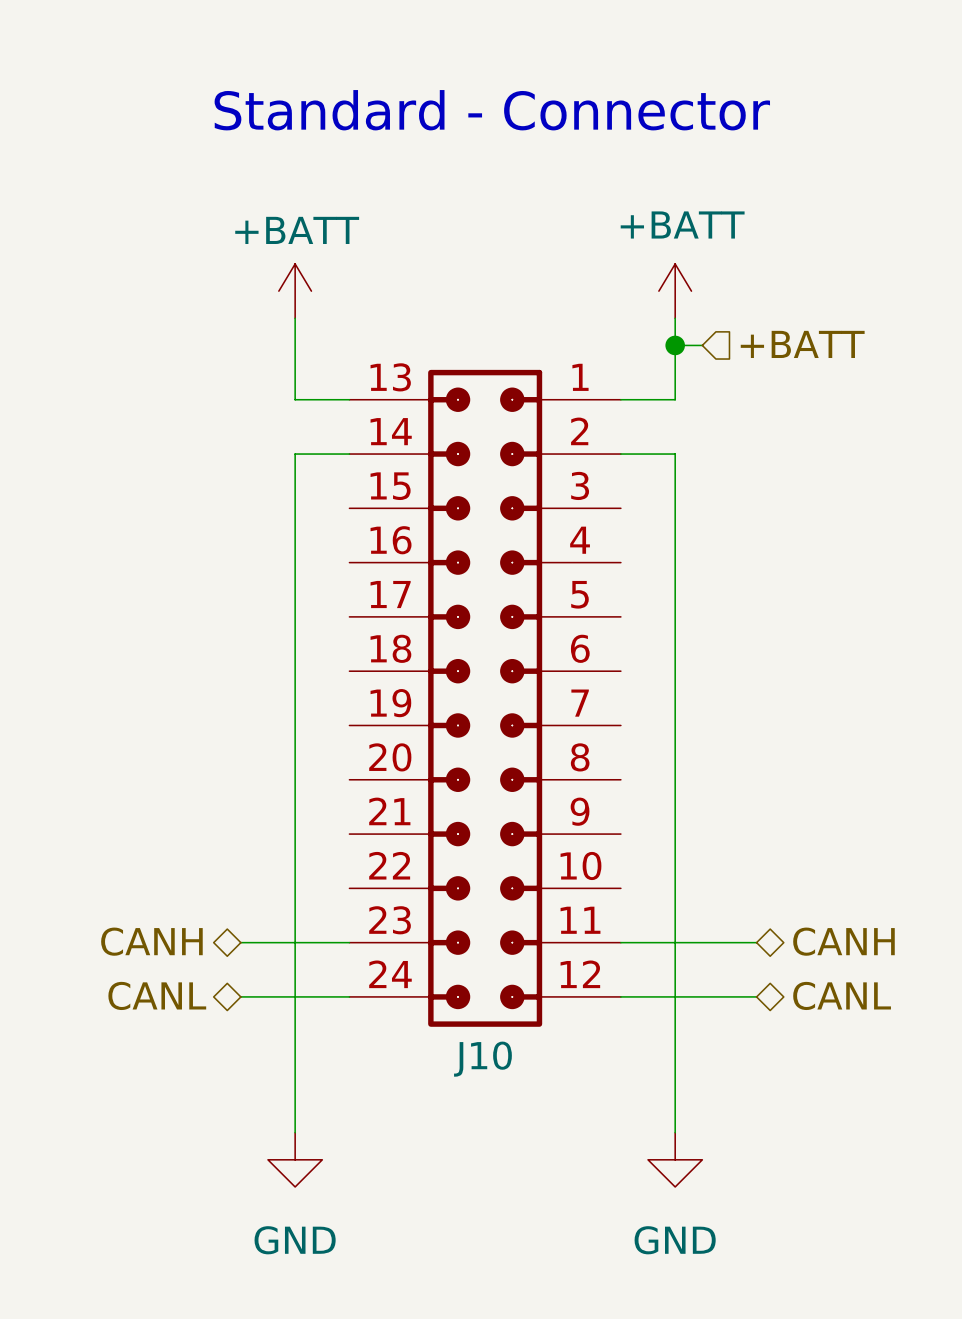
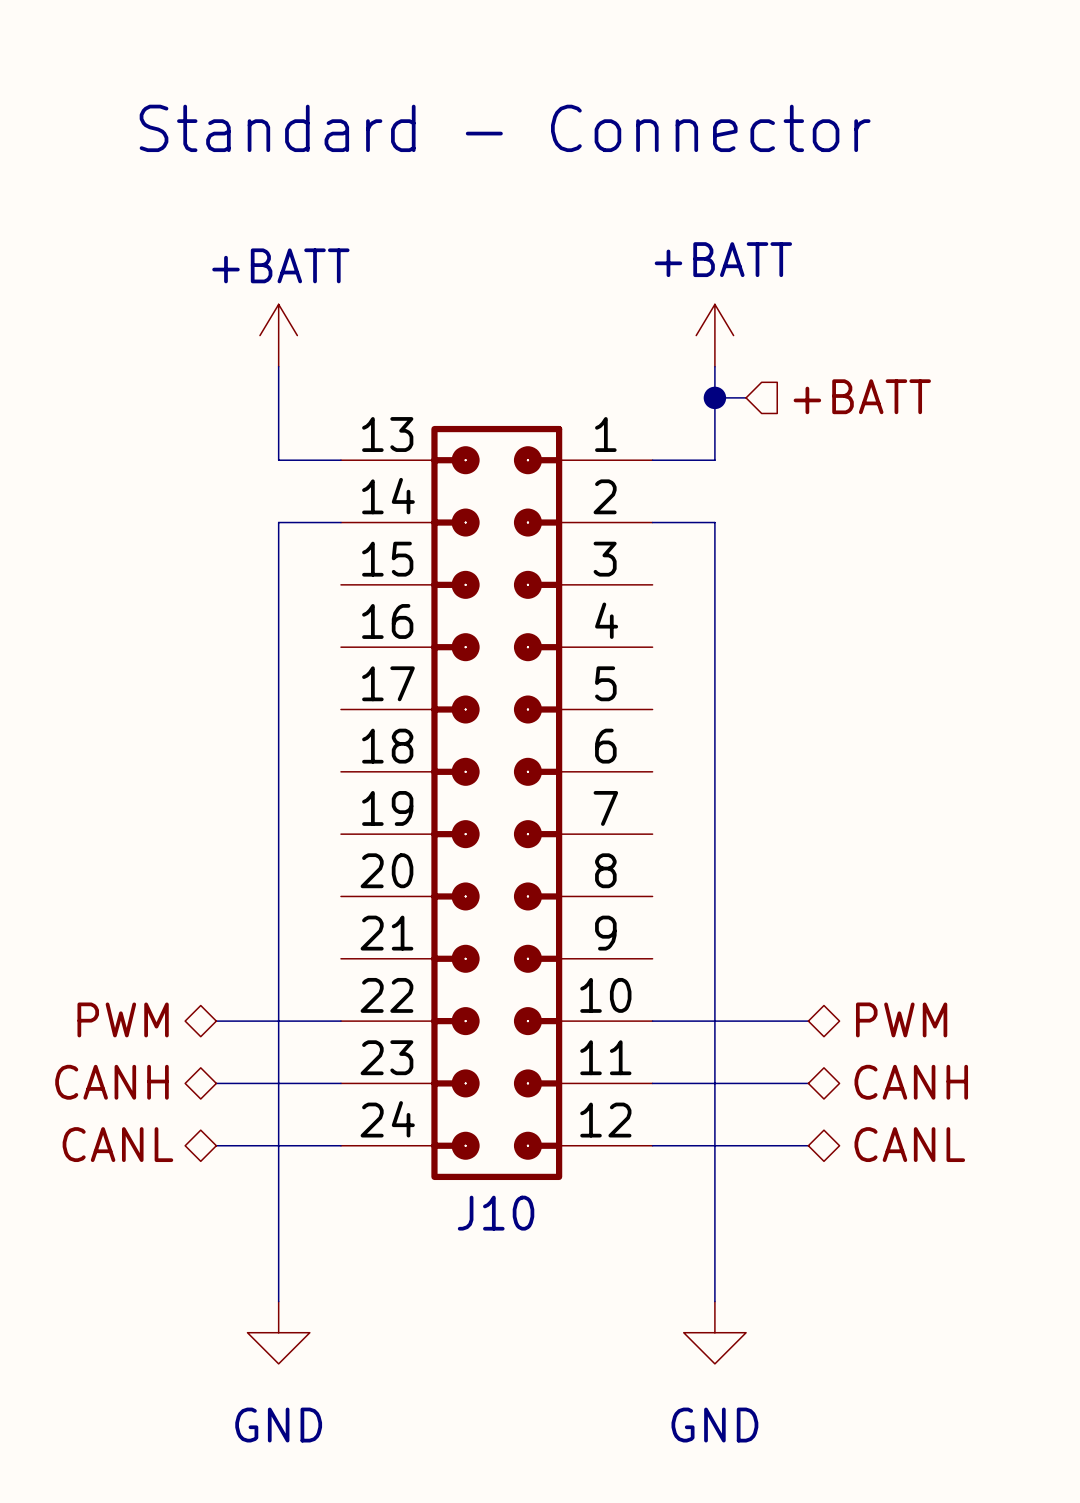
hierarchical label: none -> PWM (123, 1019)
hierarchical label: none -> PWM (901, 1019)
wire: none -> (216, 1021) (340, 1021)
wire: none -> (652, 1021) (808, 1021)

